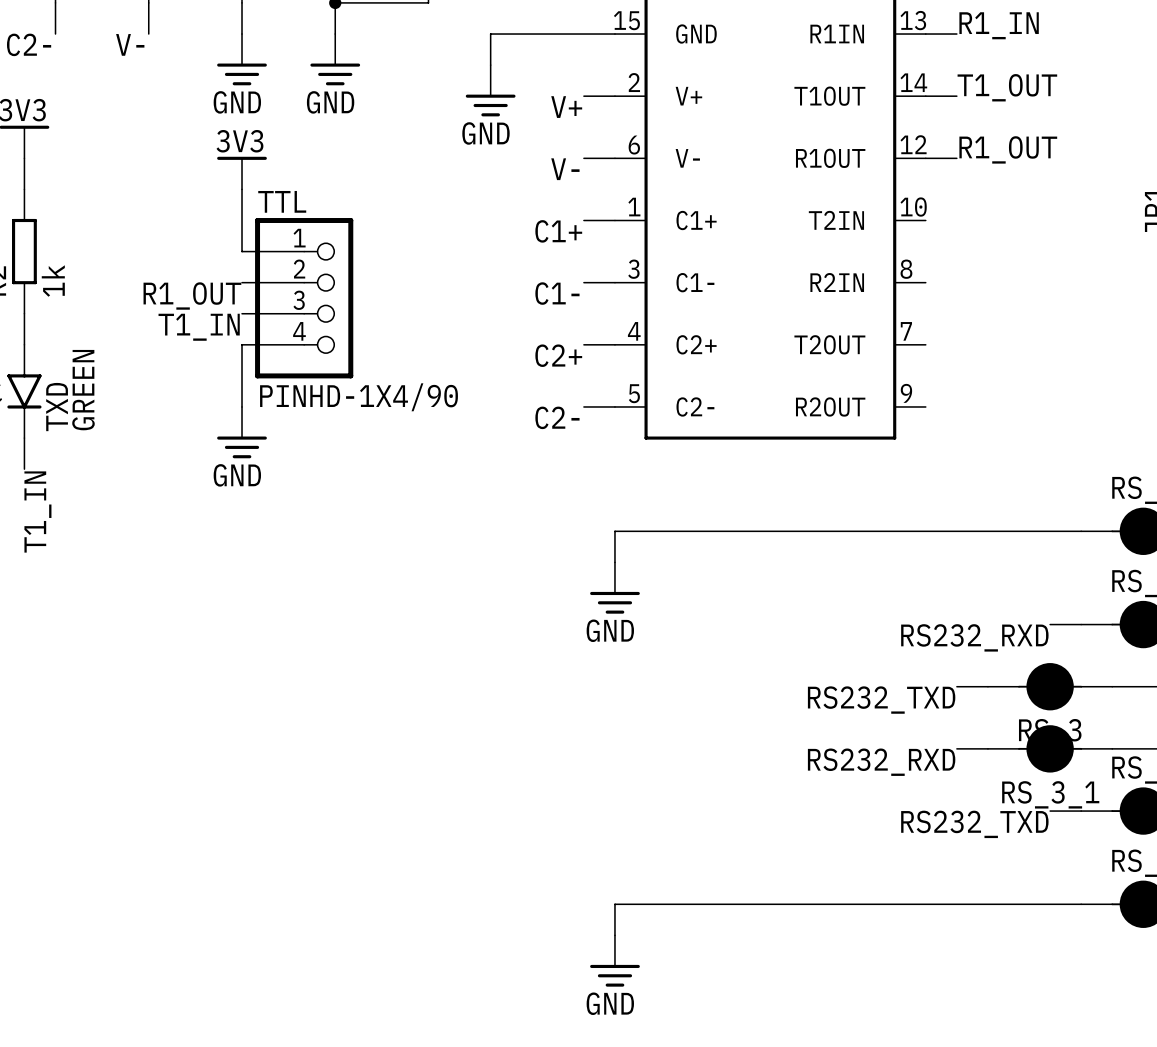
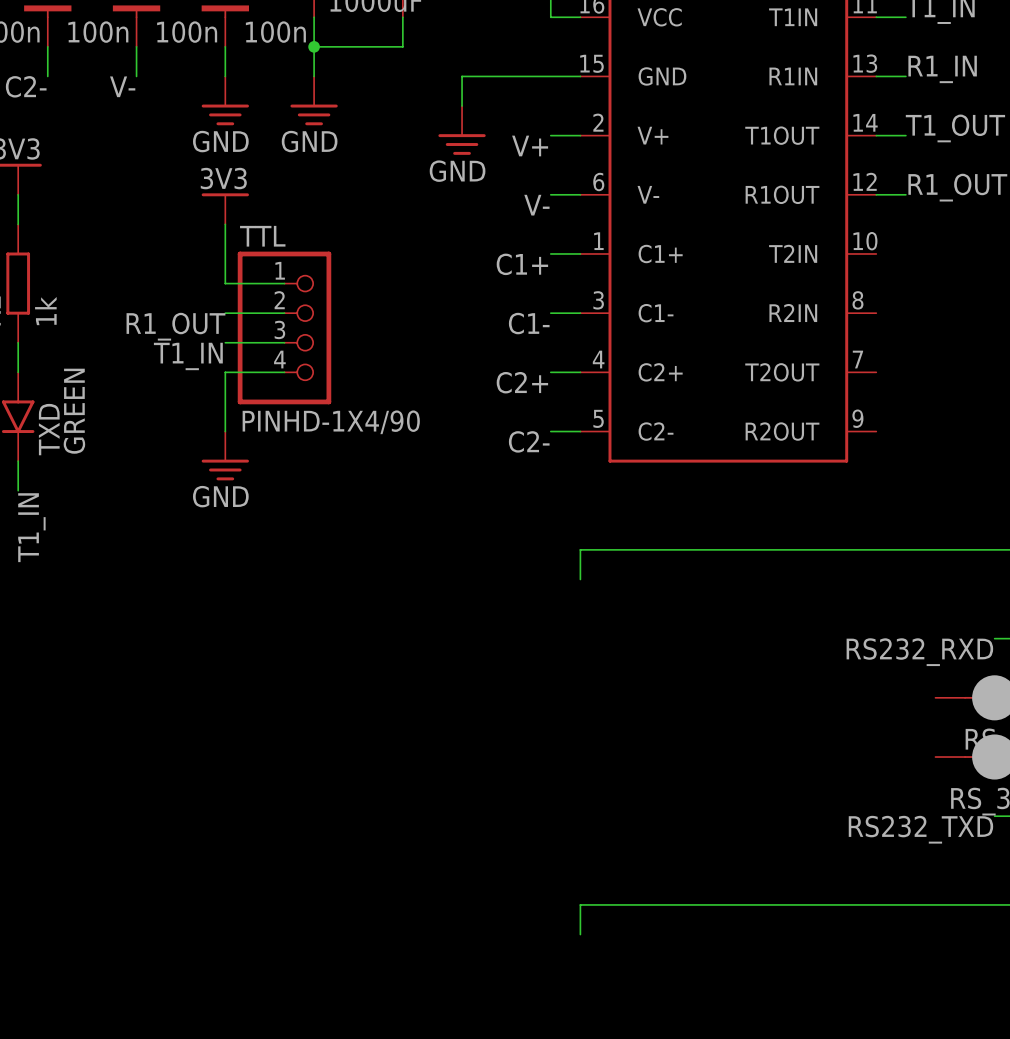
power symbol: GND (614, 588) -> none
wire: (956, 686) (987, 686) -> none
label: RS232_TXD (881, 700) -> none
wire: (956, 748) (987, 748) -> none
label: RS232_RXD (881, 762) -> none
power symbol: GND (614, 961) -> none

